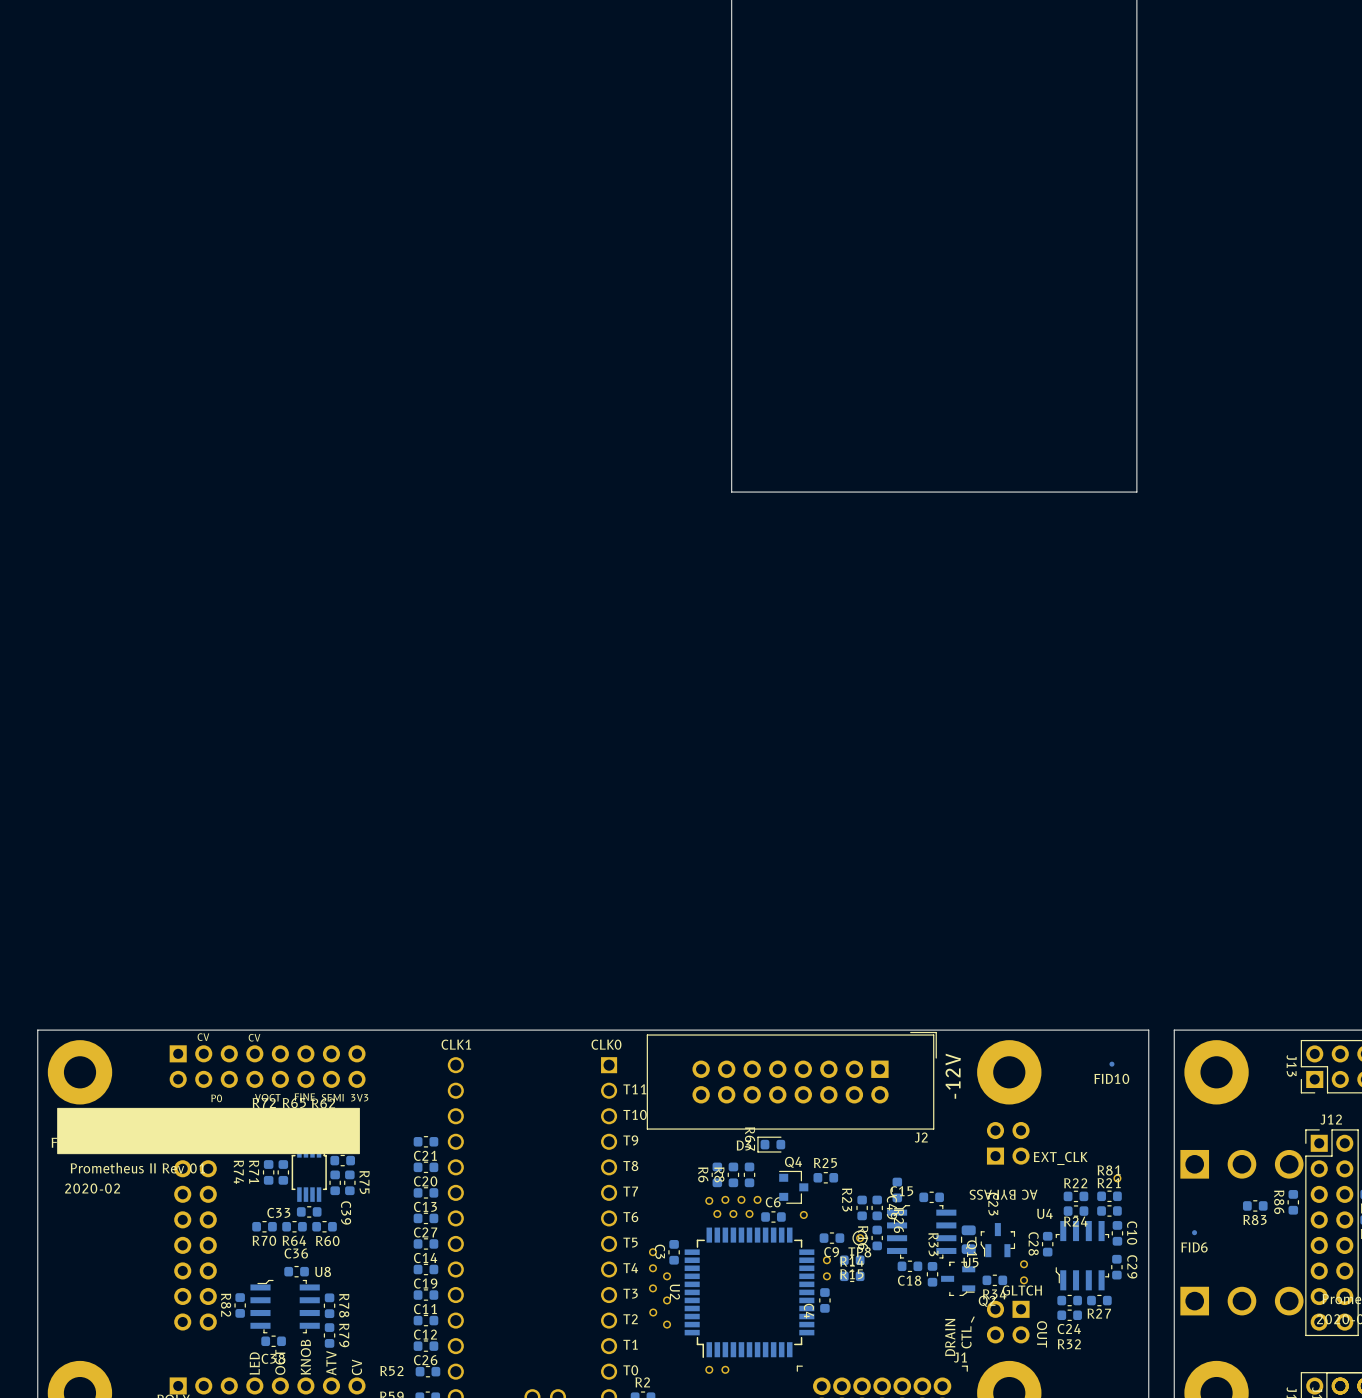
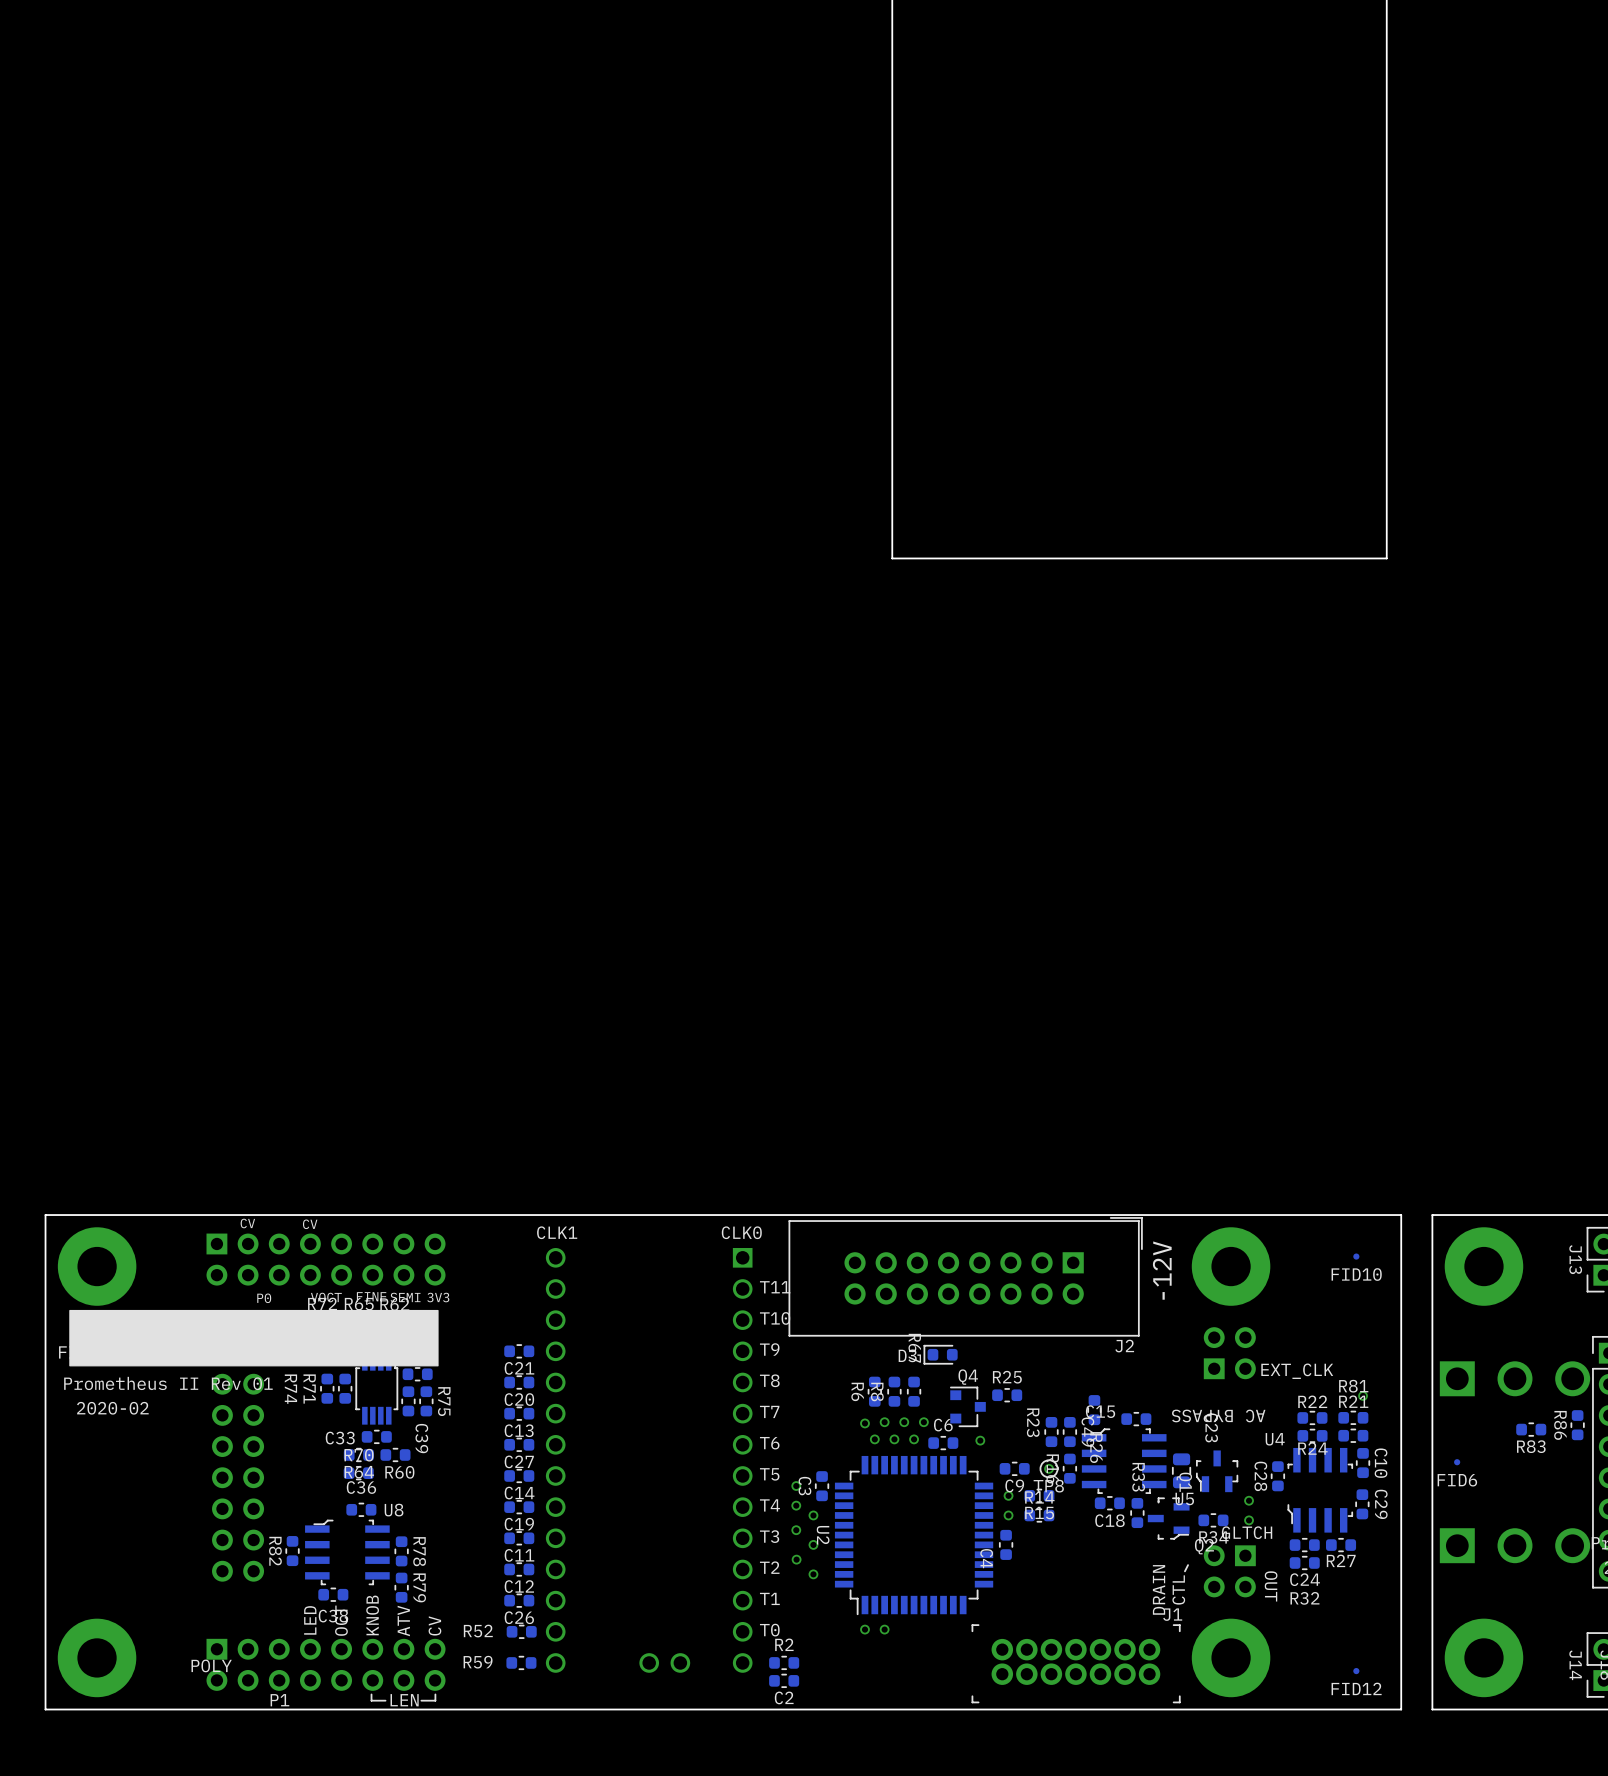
R70 position: (264, 1226) -> (358, 1473)
R70 name position: R70 (264, 1240) -> R70 (359, 1455)

